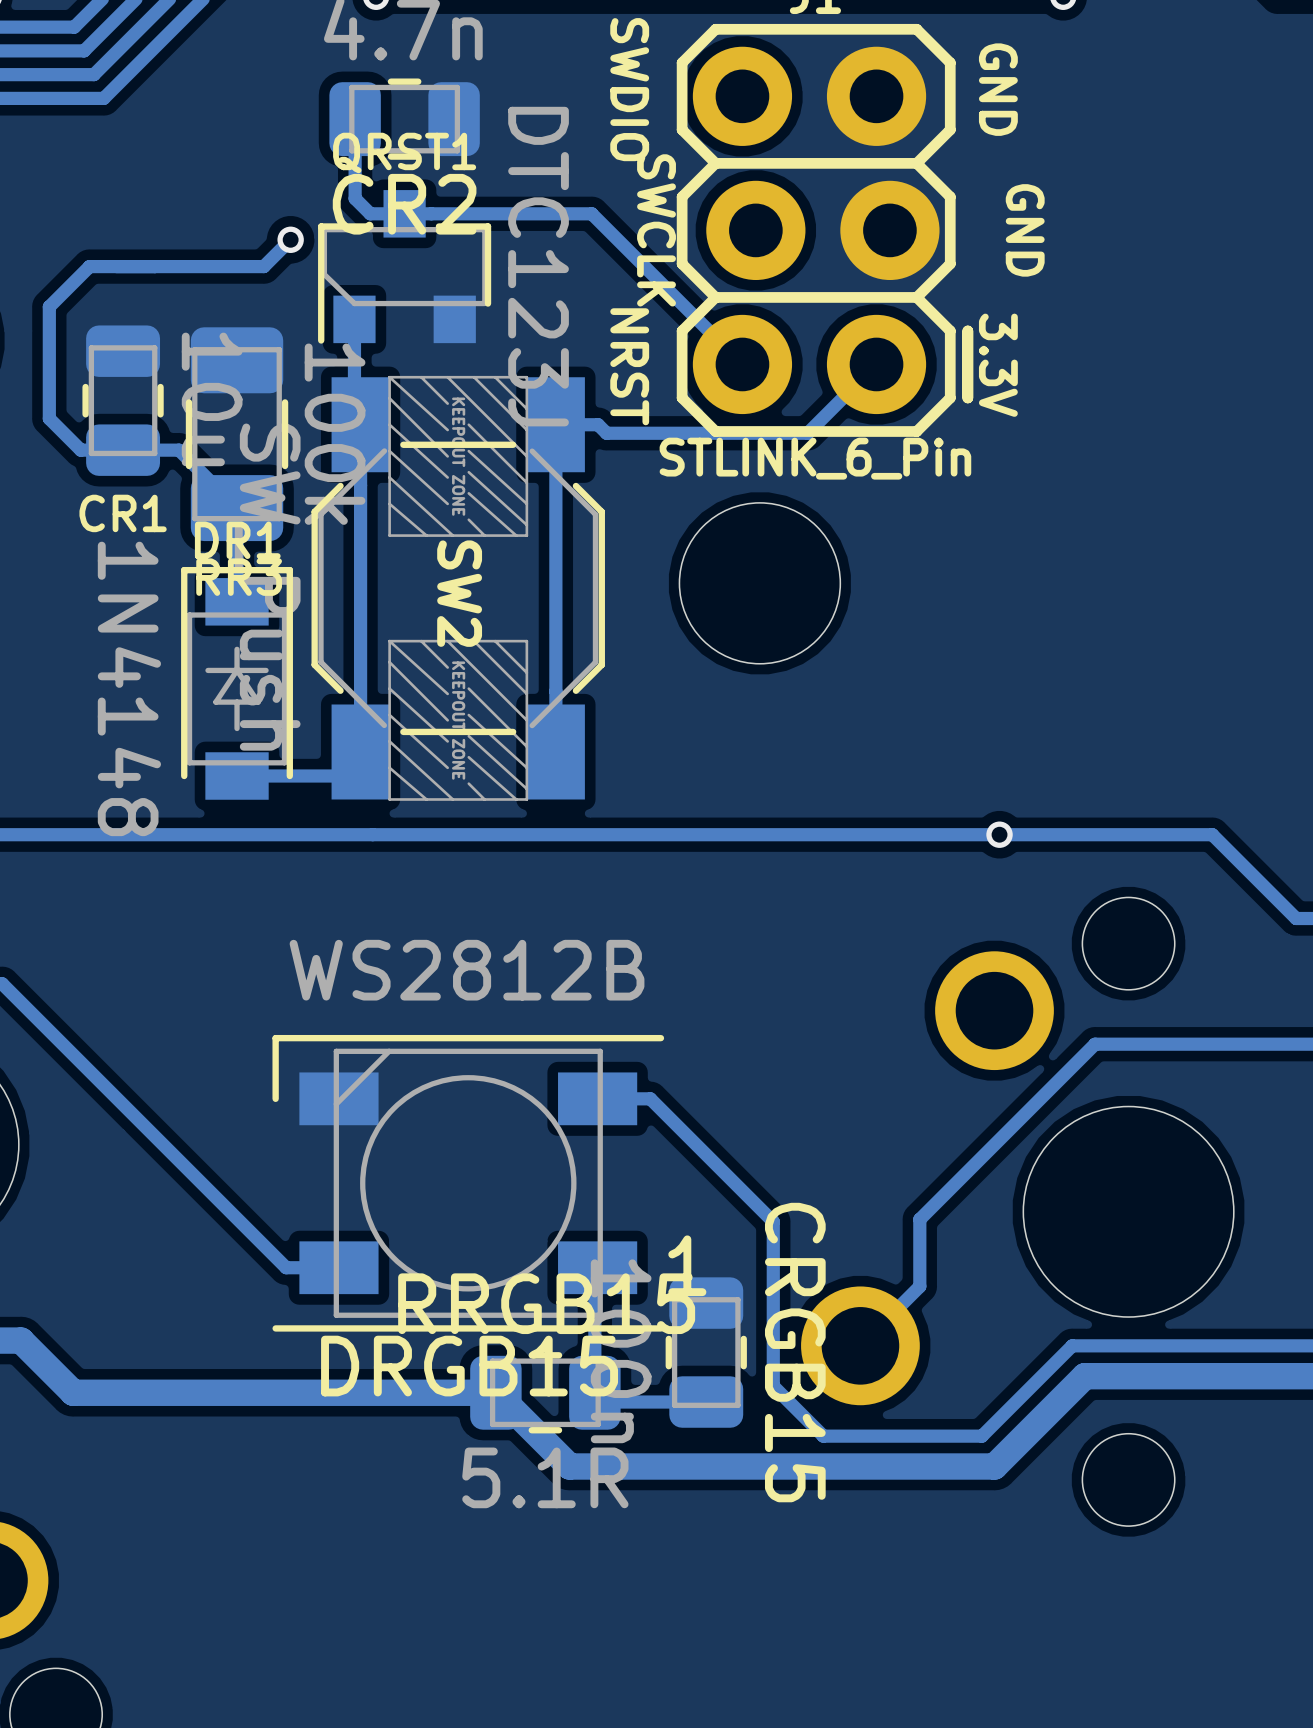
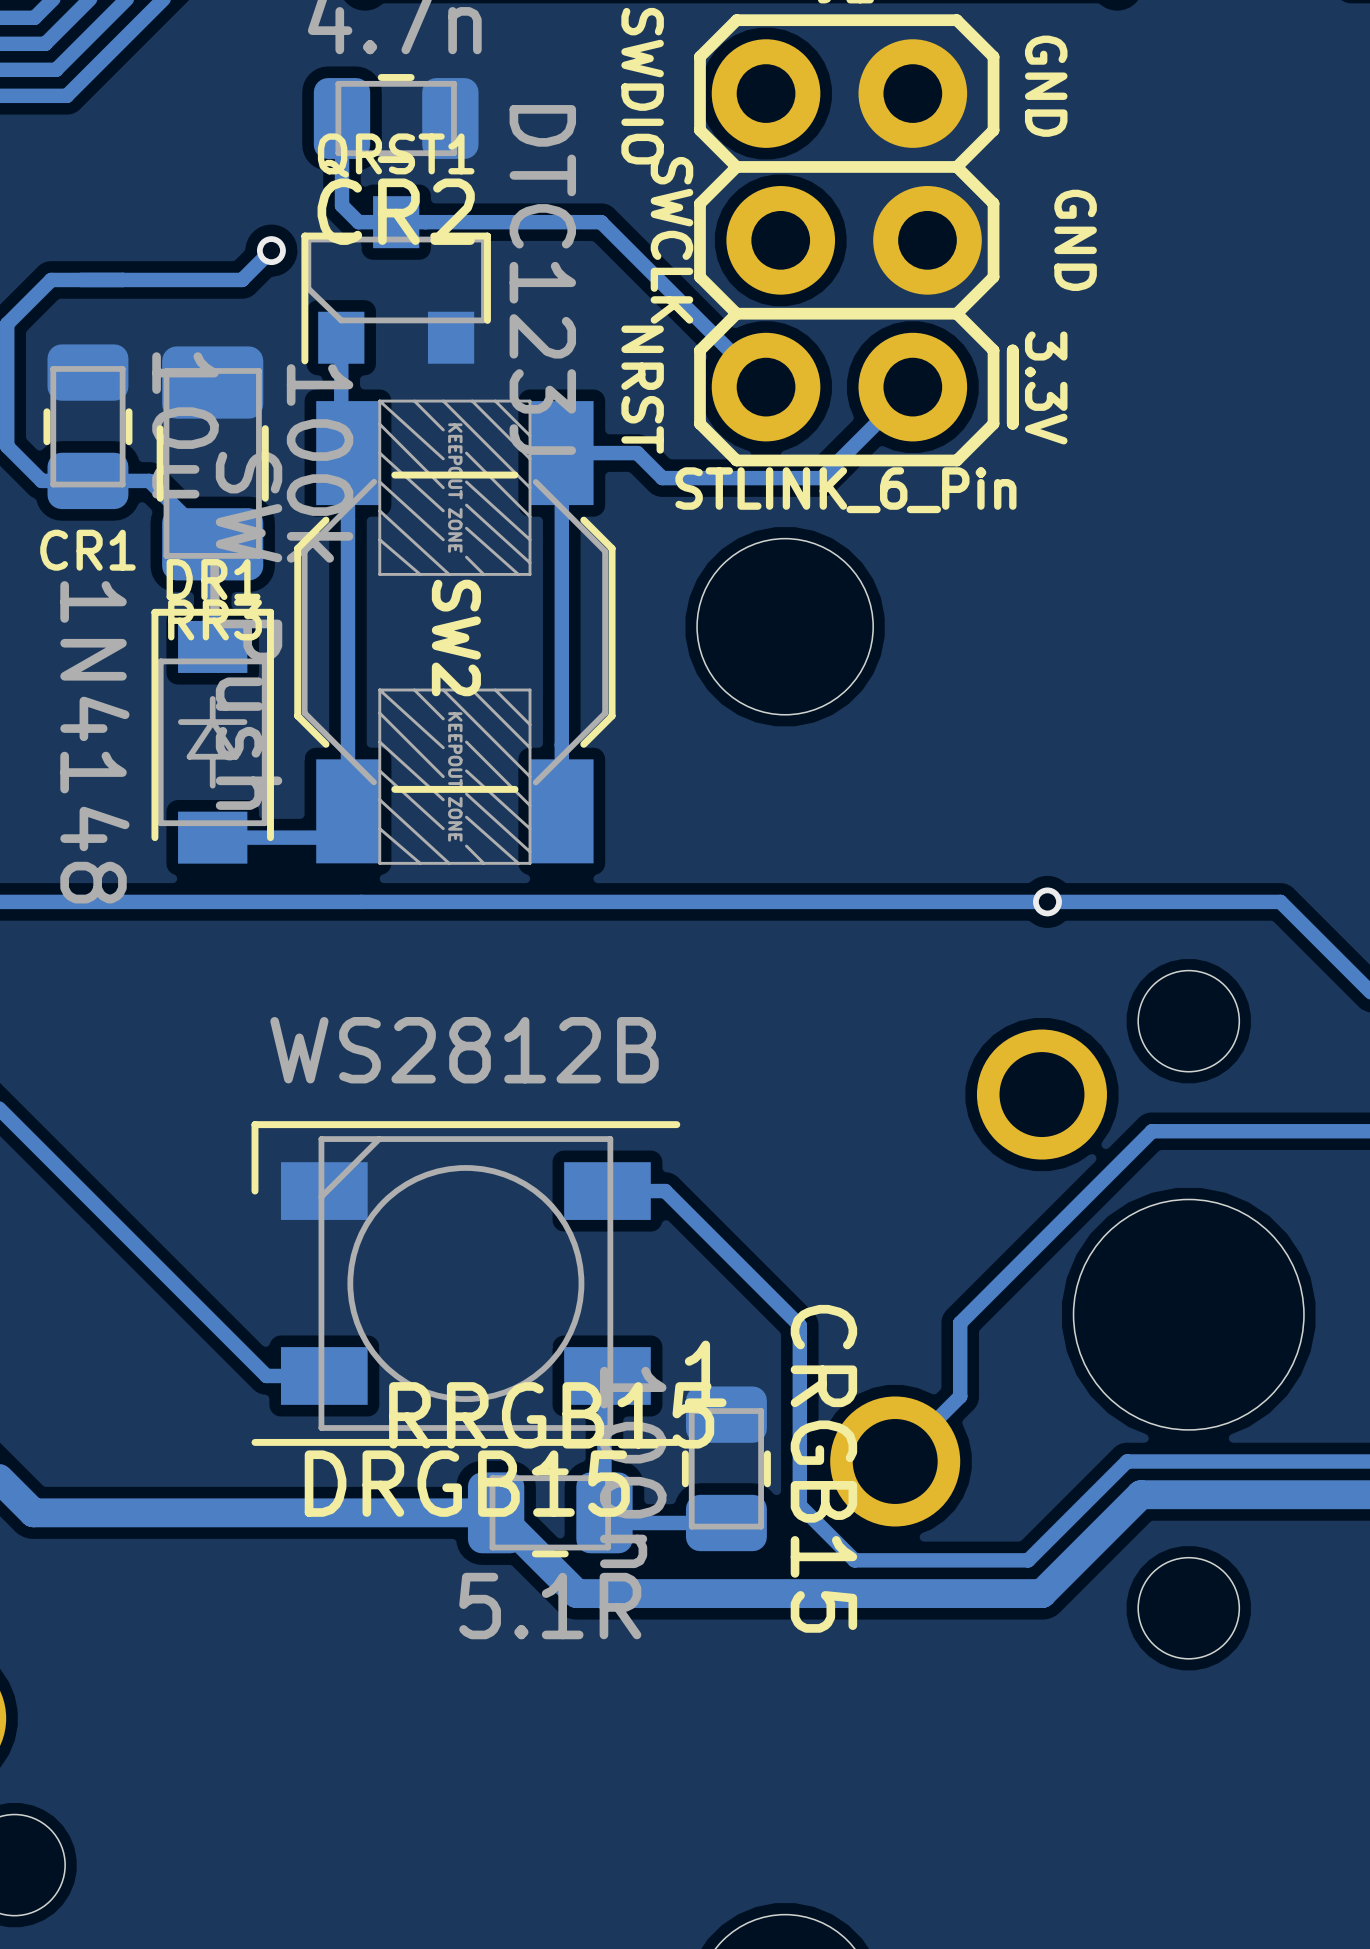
track: (598, 424) (606, 433) (807, 433) -> (608, 453) (637, 453) (662, 478) (821, 478) (837, 462)

